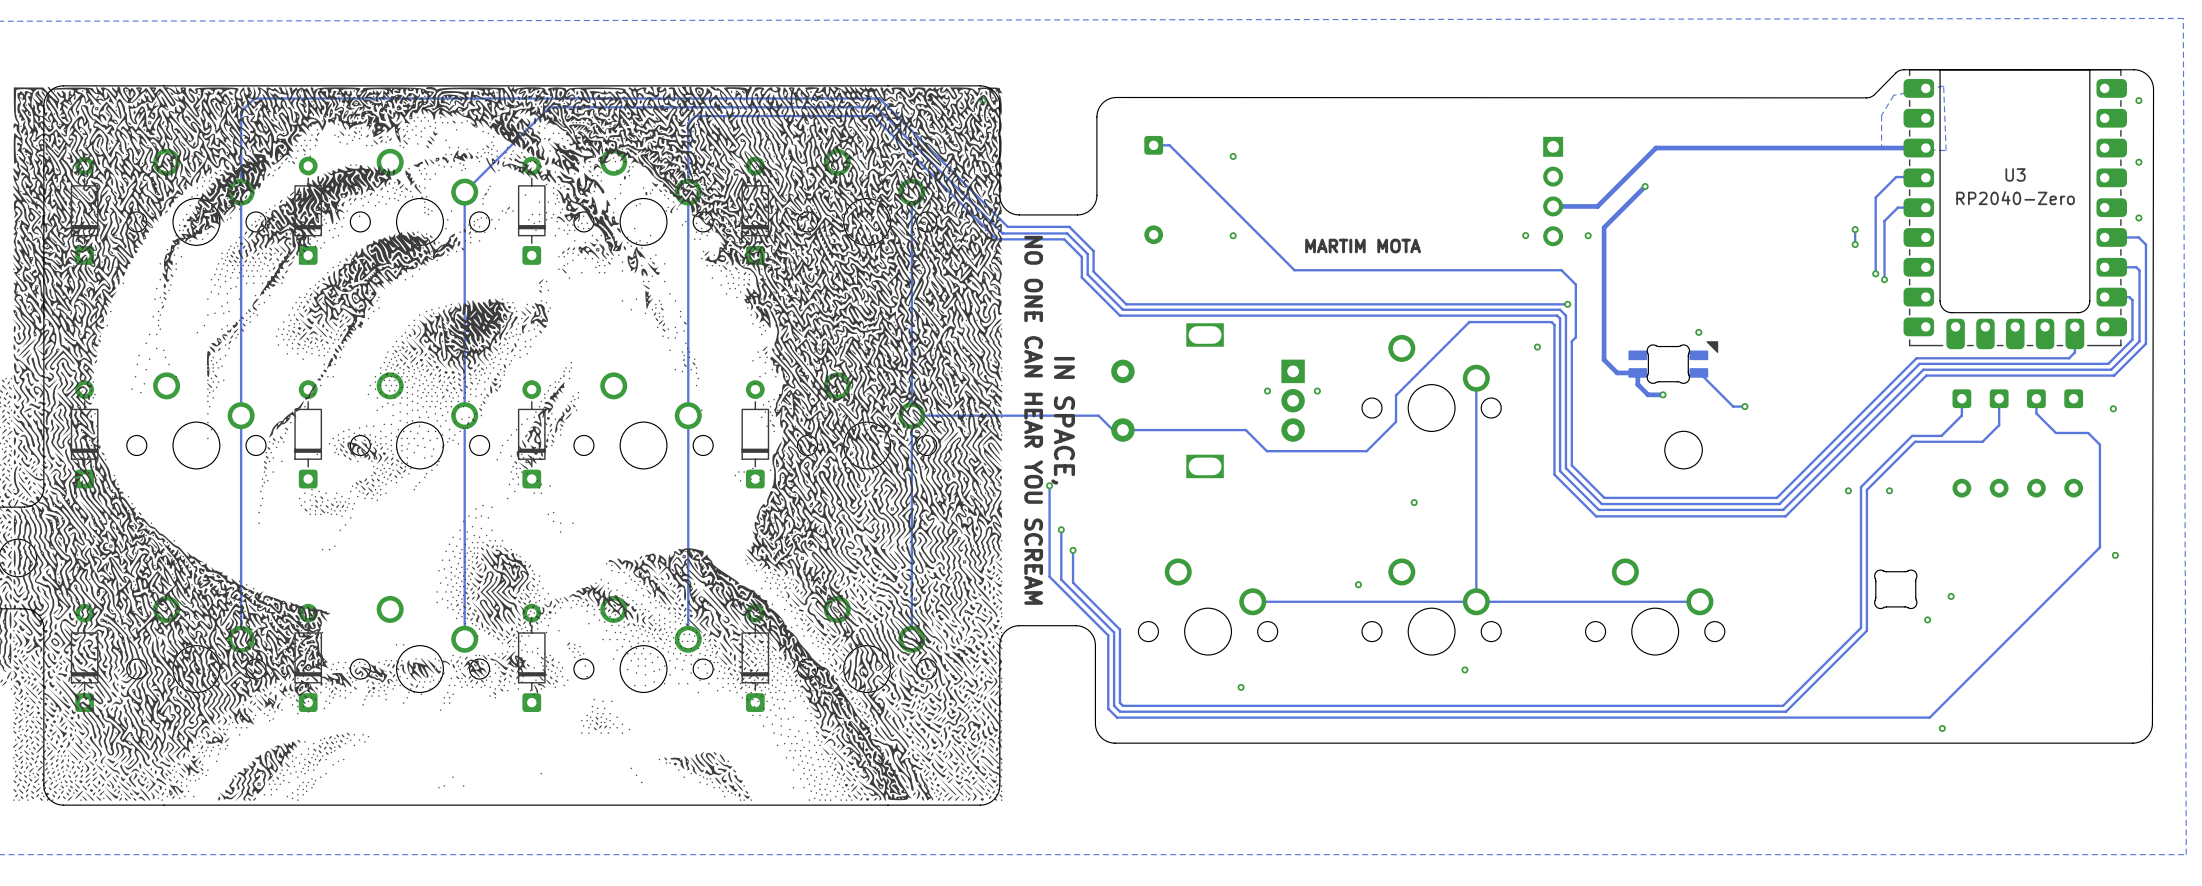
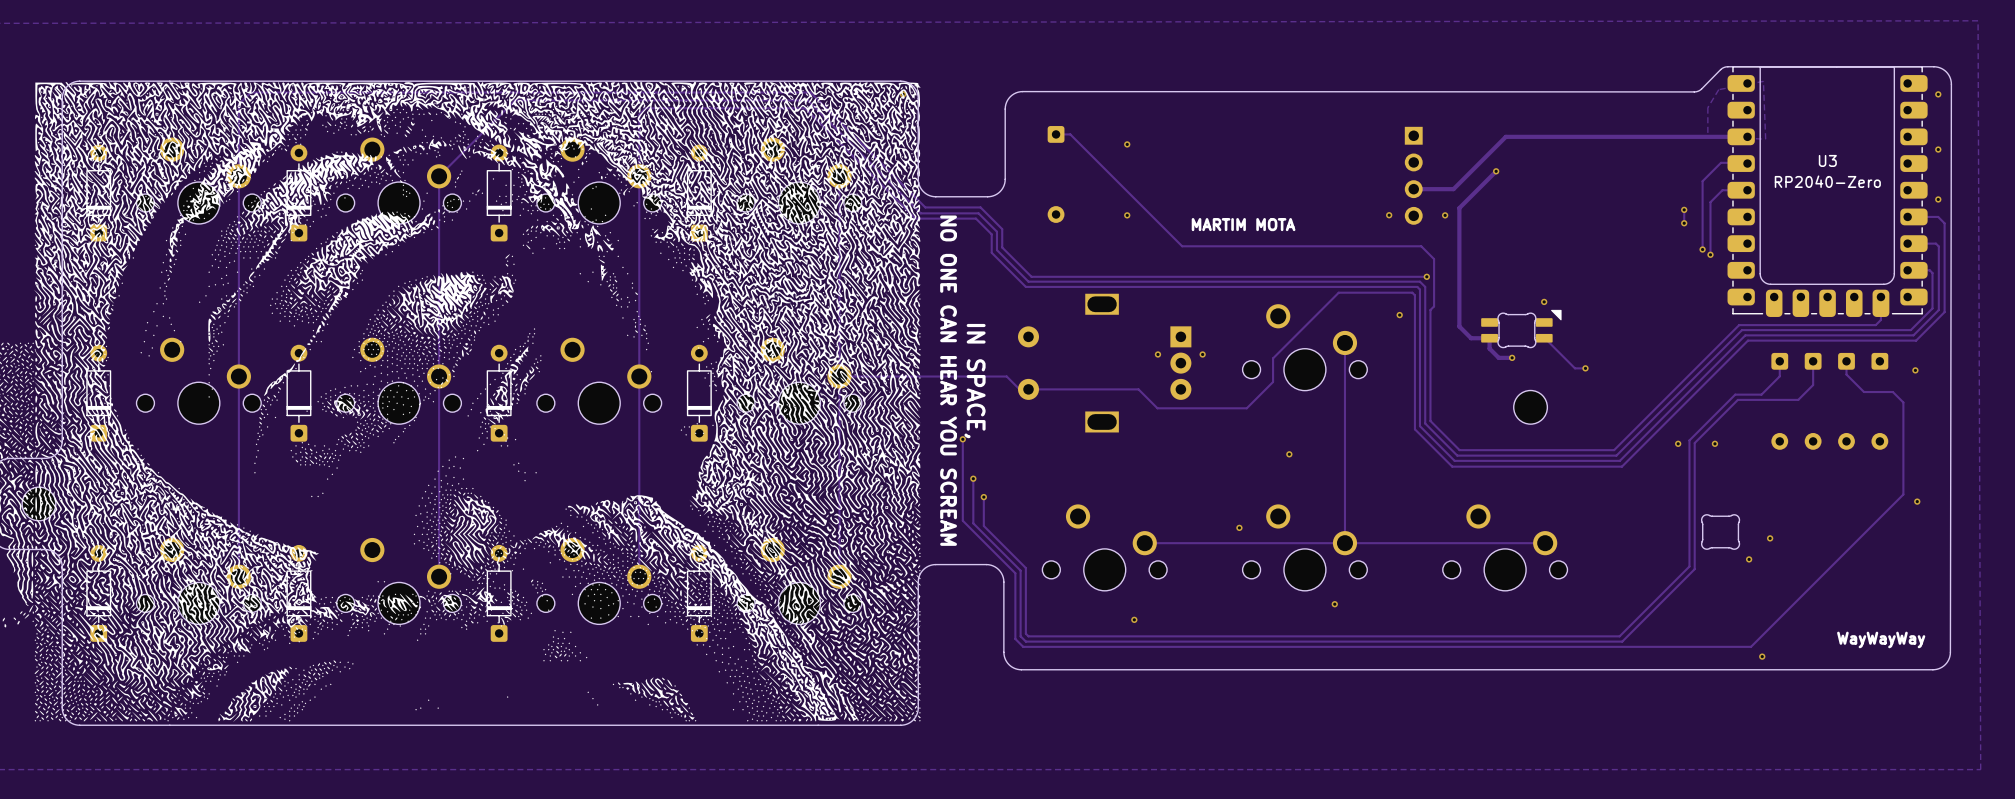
text: none -> WayWayWay (1881, 639)

